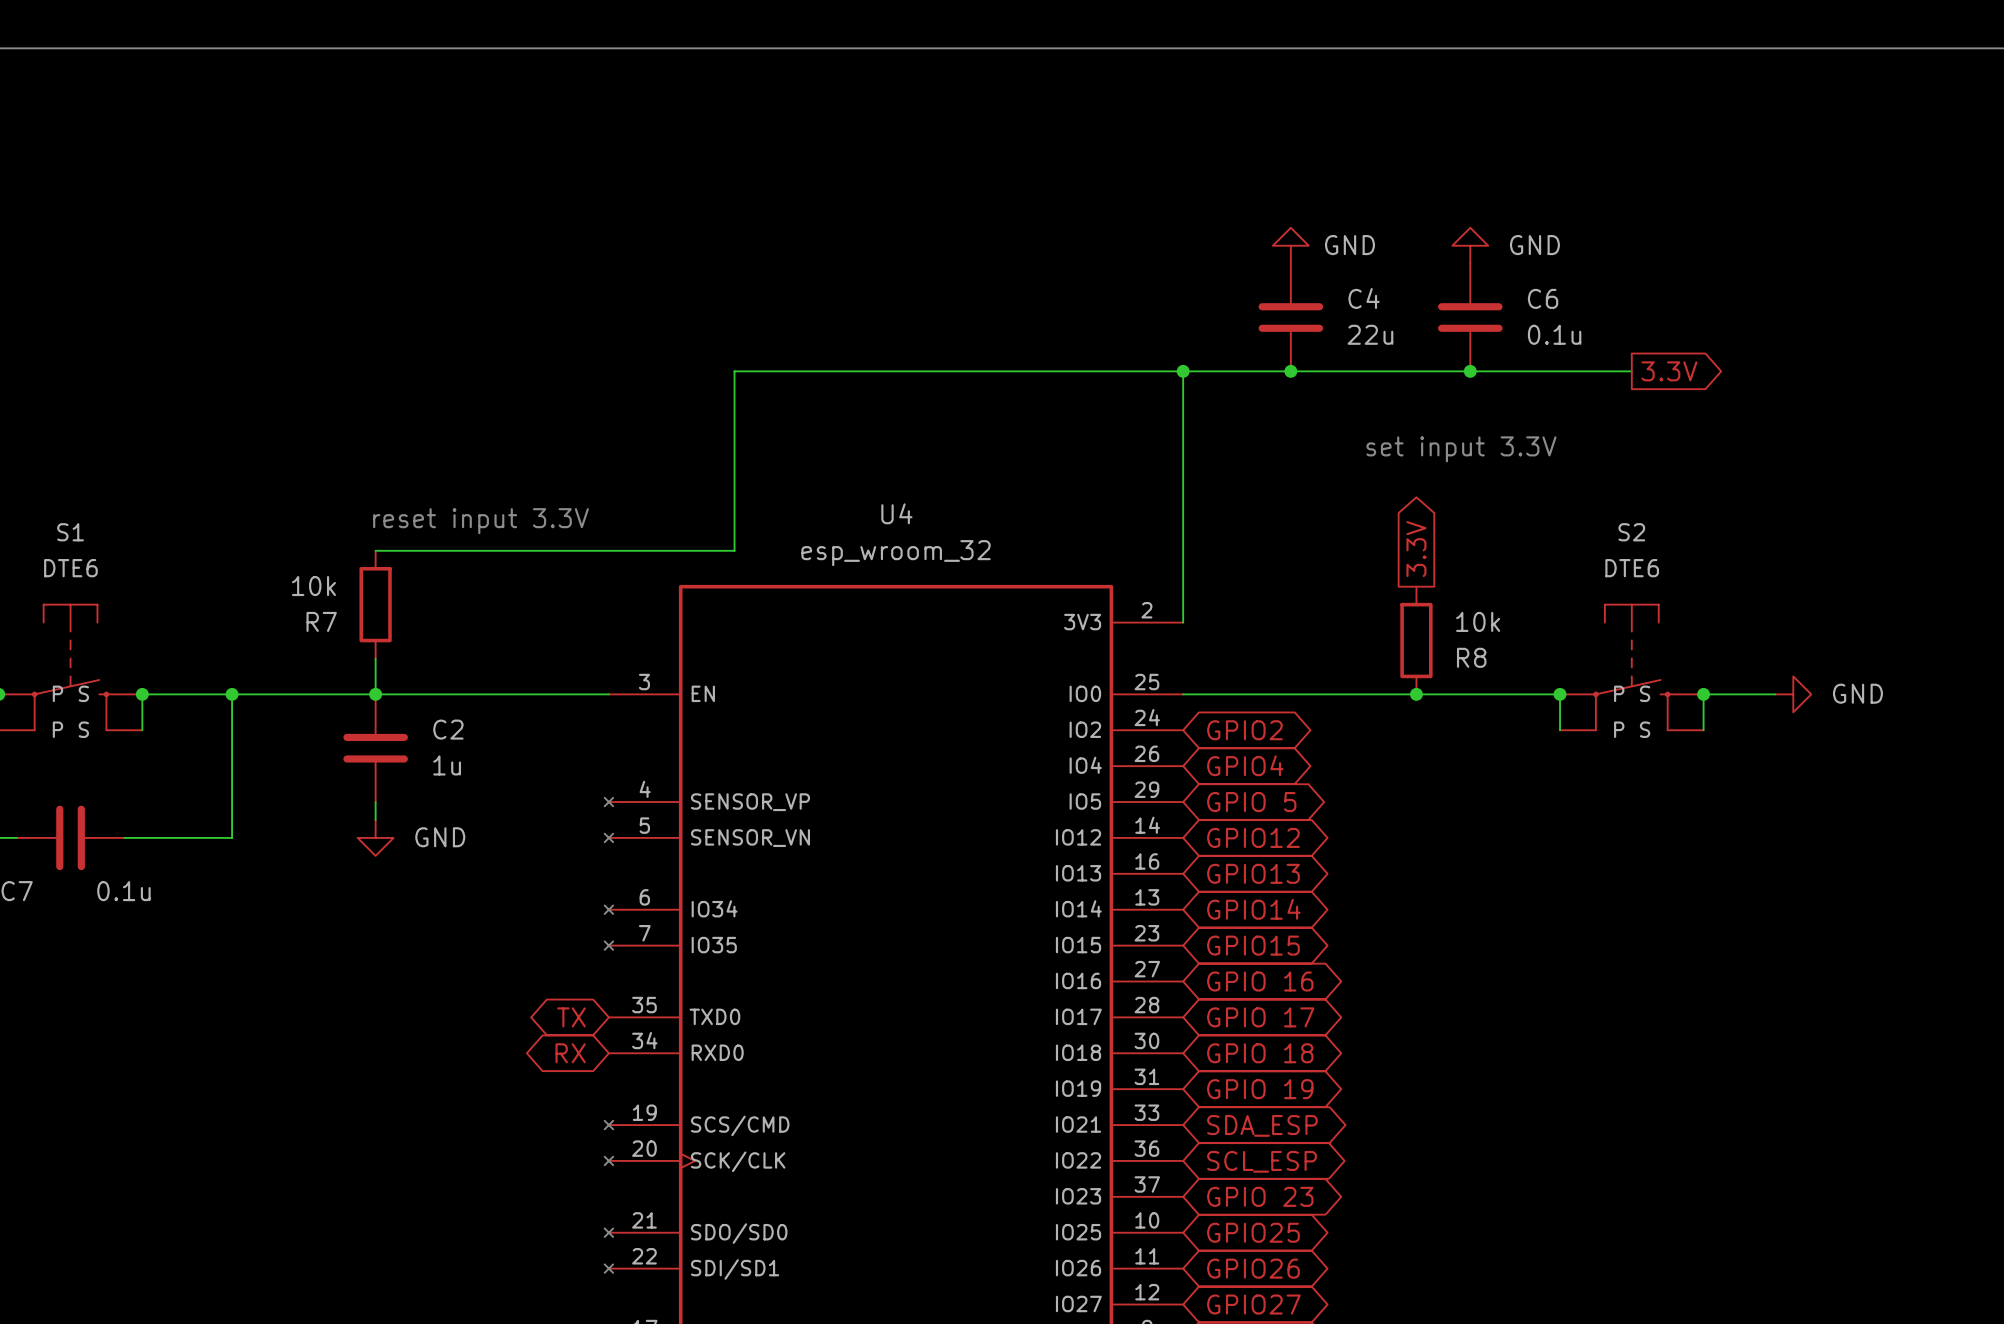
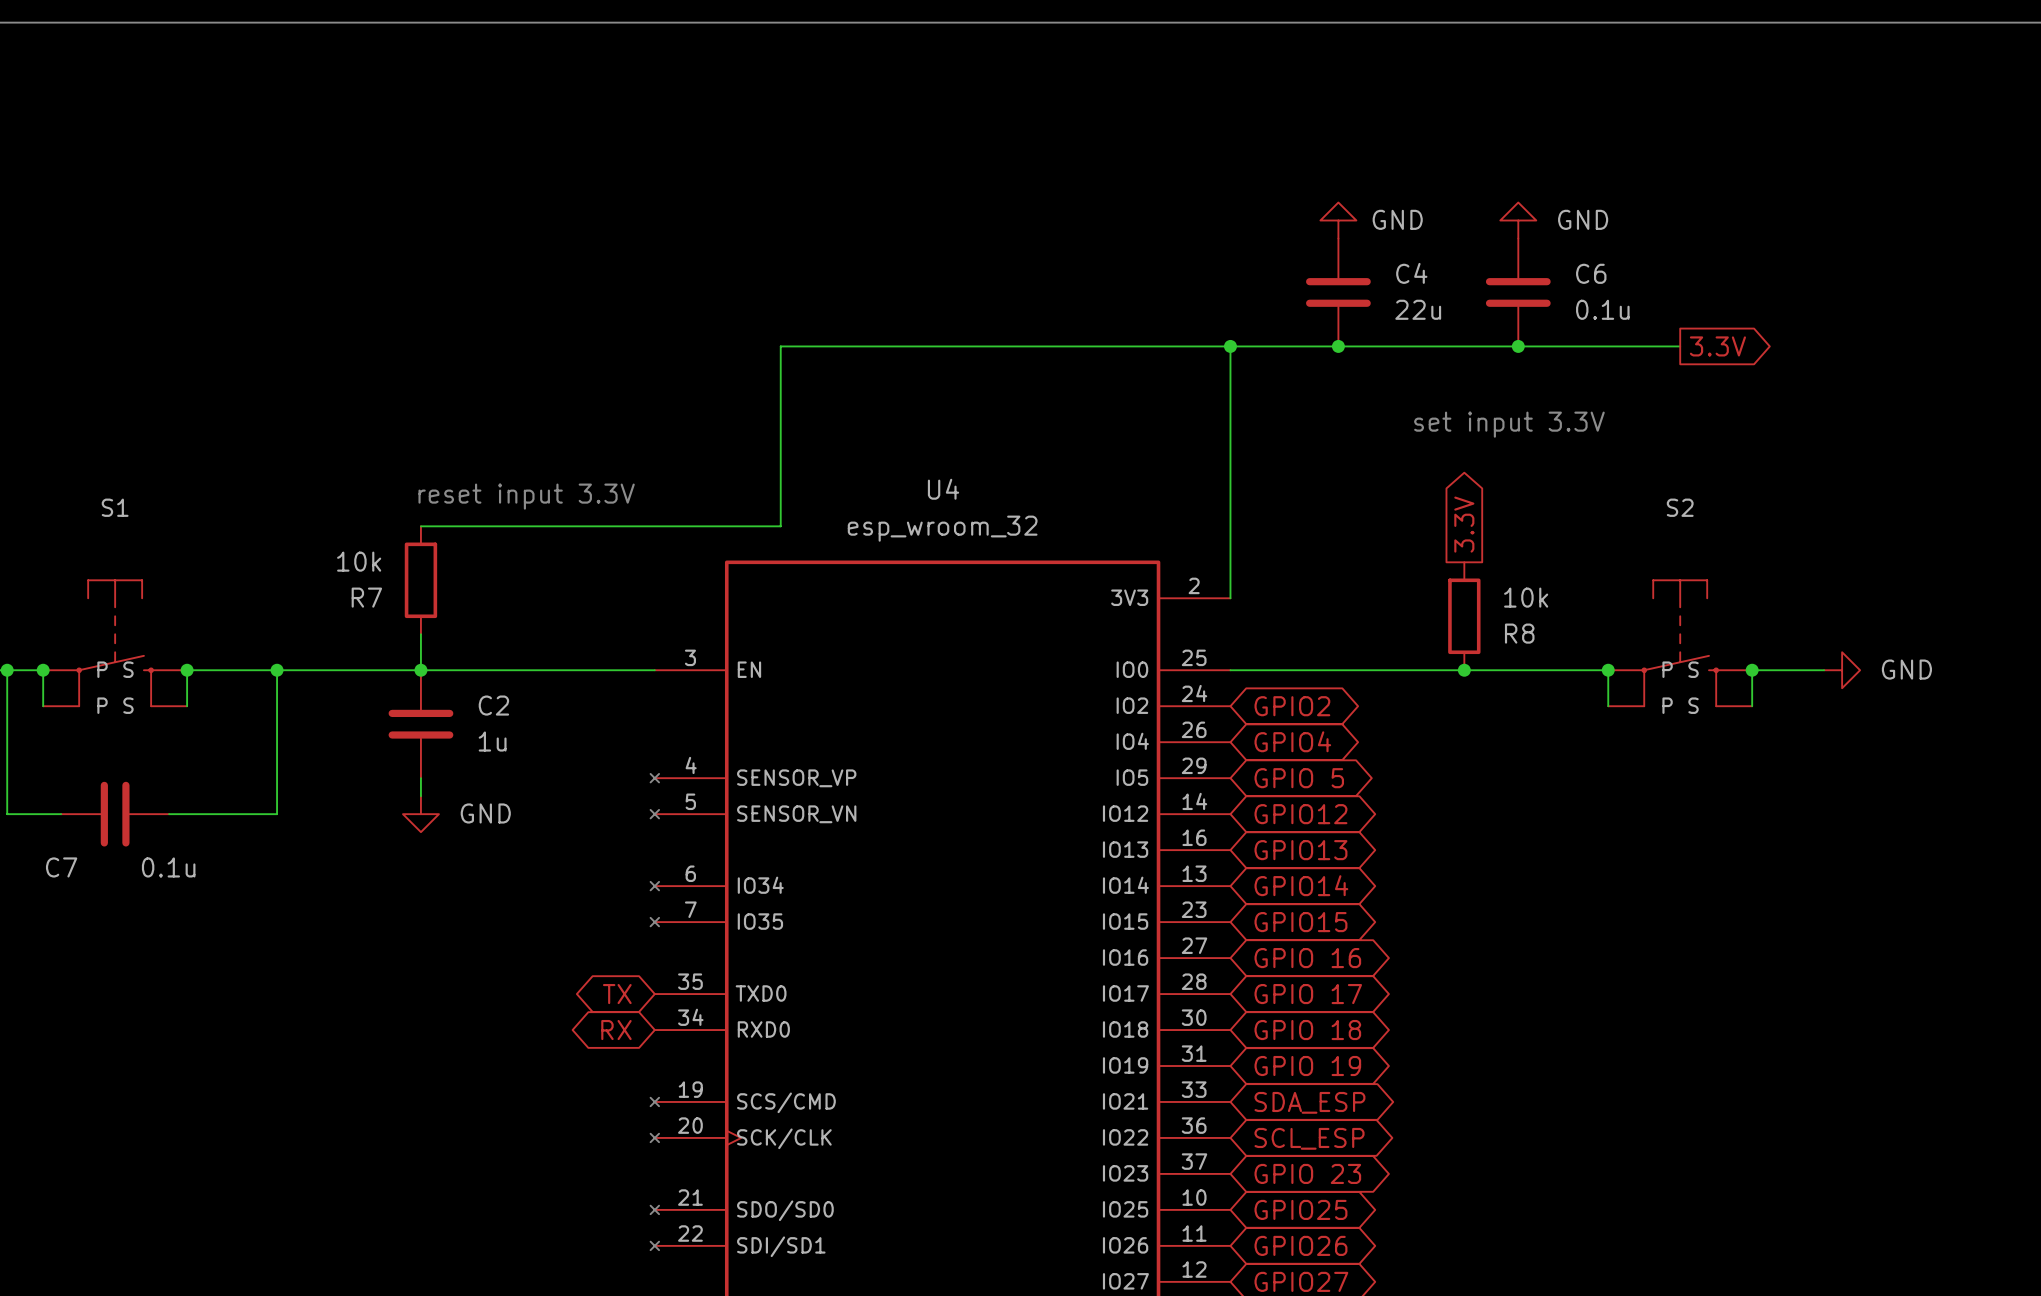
S1 value: DTE6 (70, 568) -> none
S2 value: DTE6 (1632, 568) -> none

